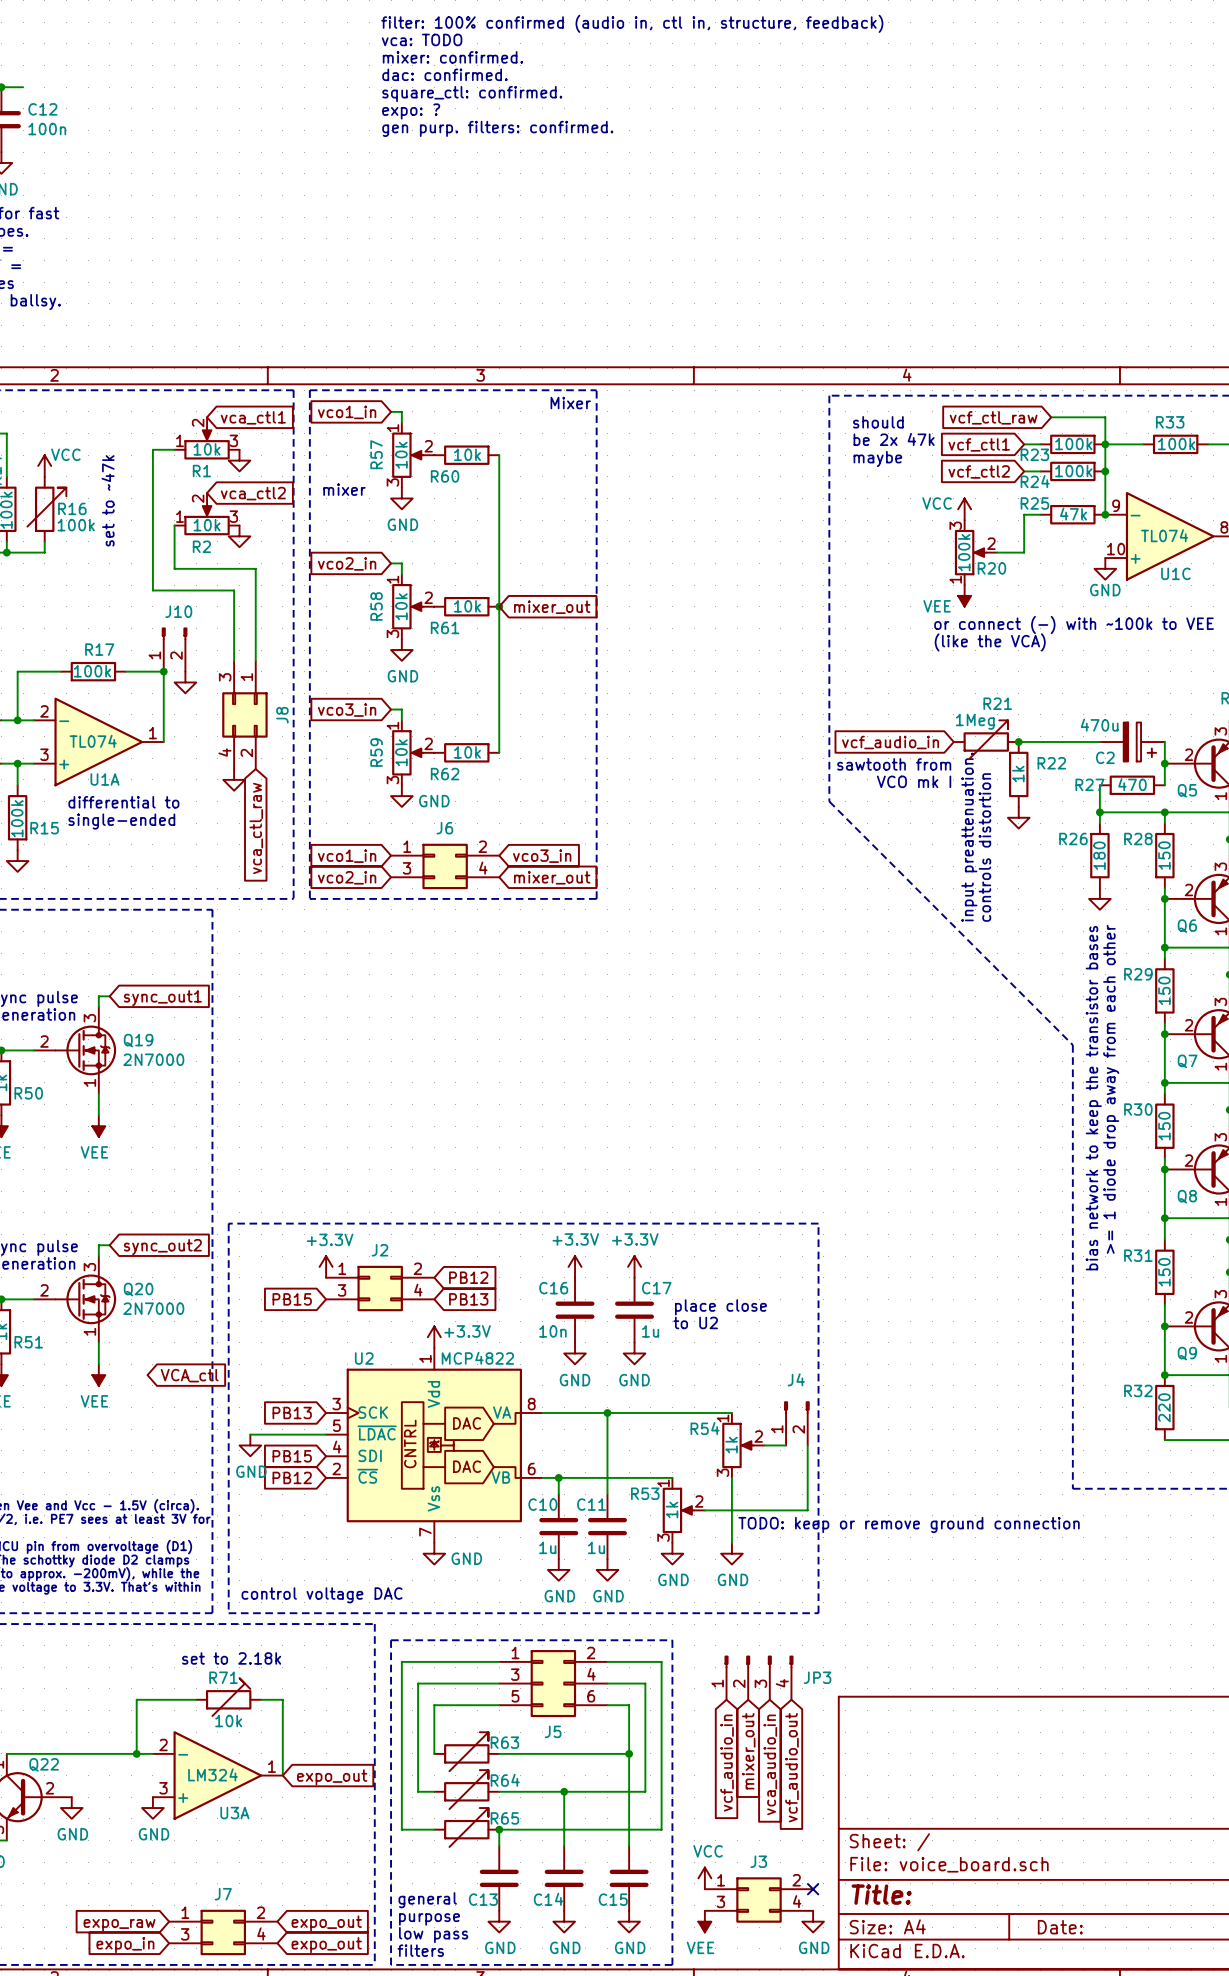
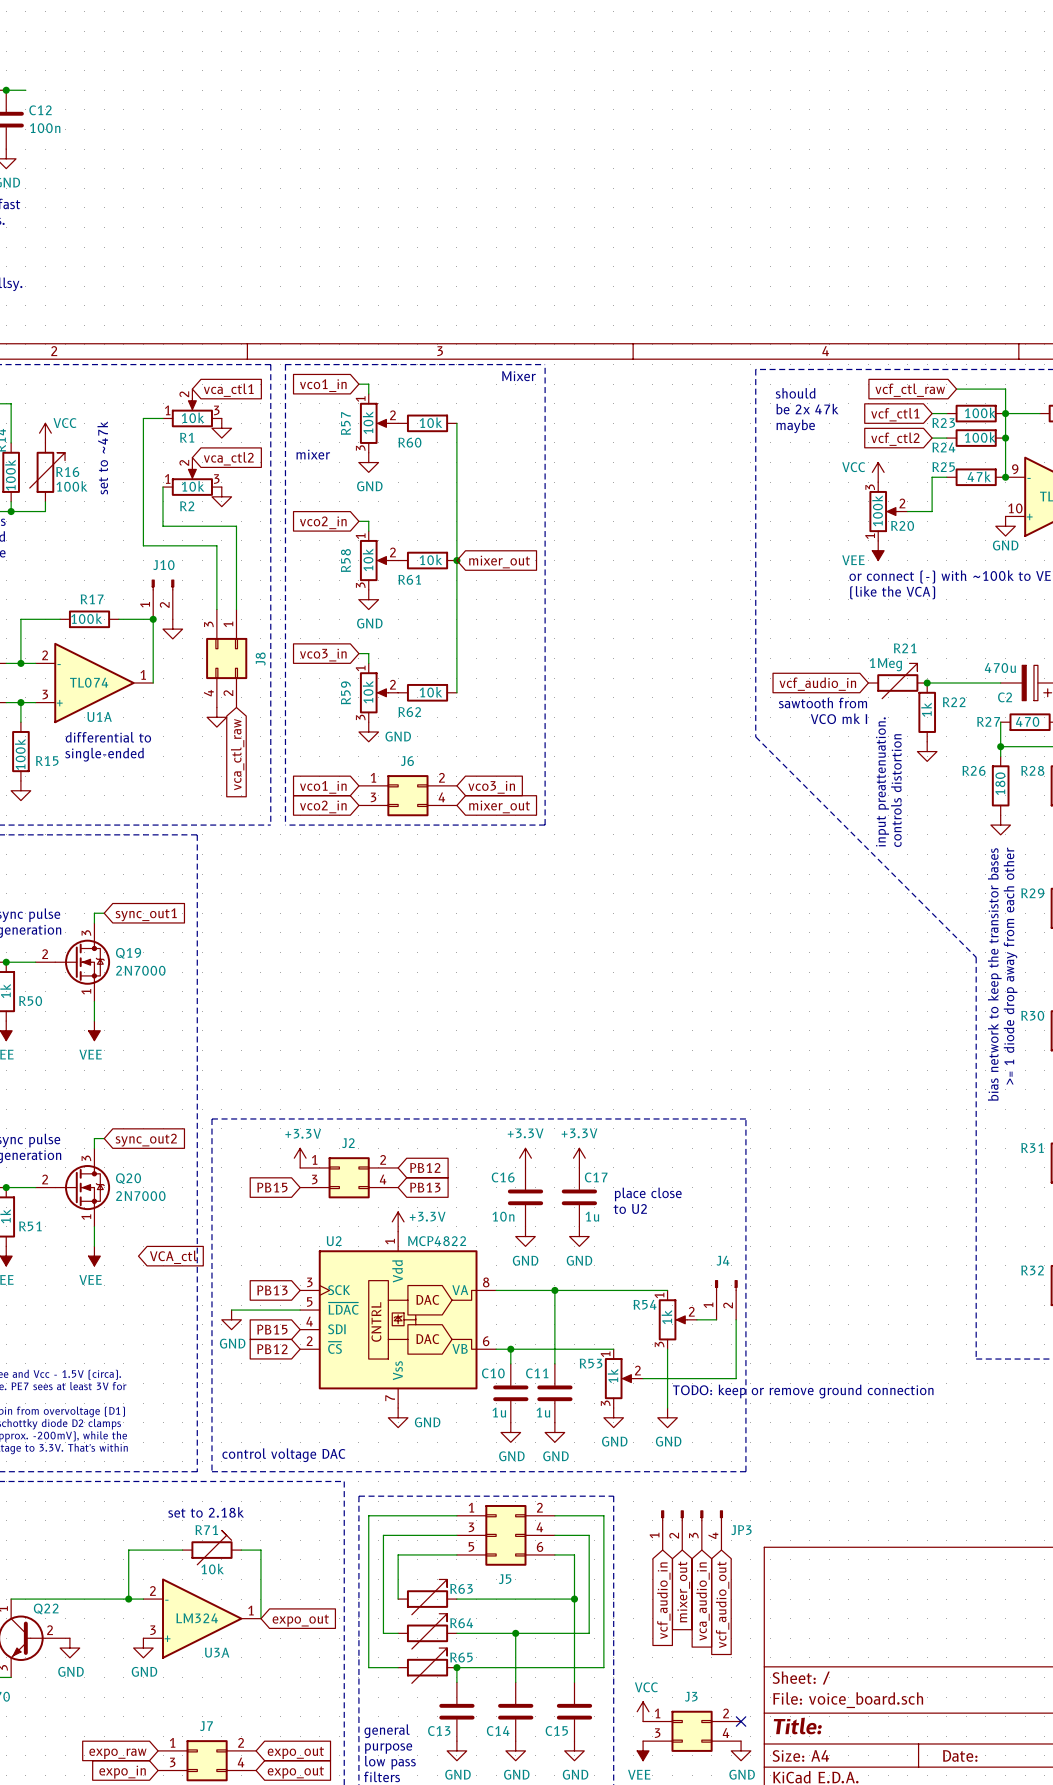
text: filter: 100% confirmed (audio in, ctl in, structure, feedback) (632, 23) -> none
text: vca: TODO (422, 39) -> none
text: mixer: confirmed. (452, 57) -> none
text: dac: confirmed. (444, 74) -> none
text: square_ctl: confirmed. (472, 94) -> none
text: expo: ? (411, 111) -> none
text: gen purp. filters: confirmed. (497, 128) -> none

